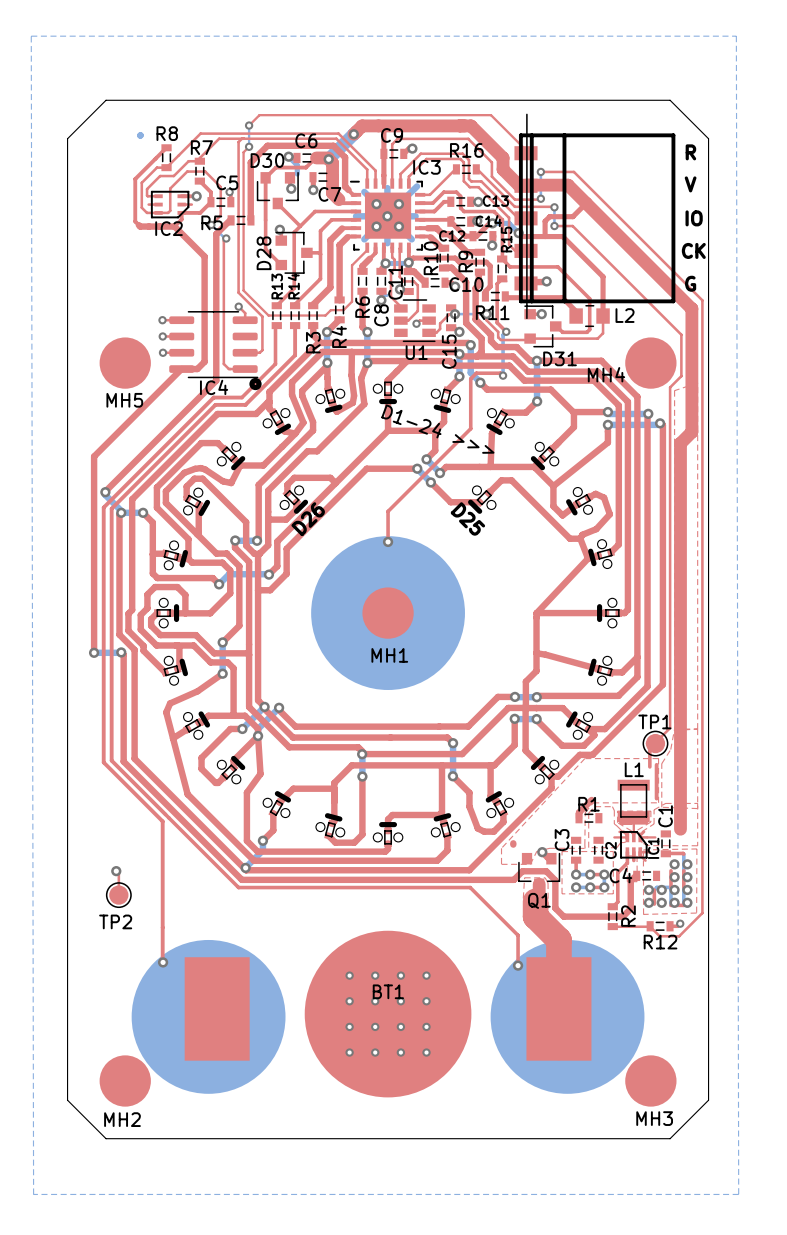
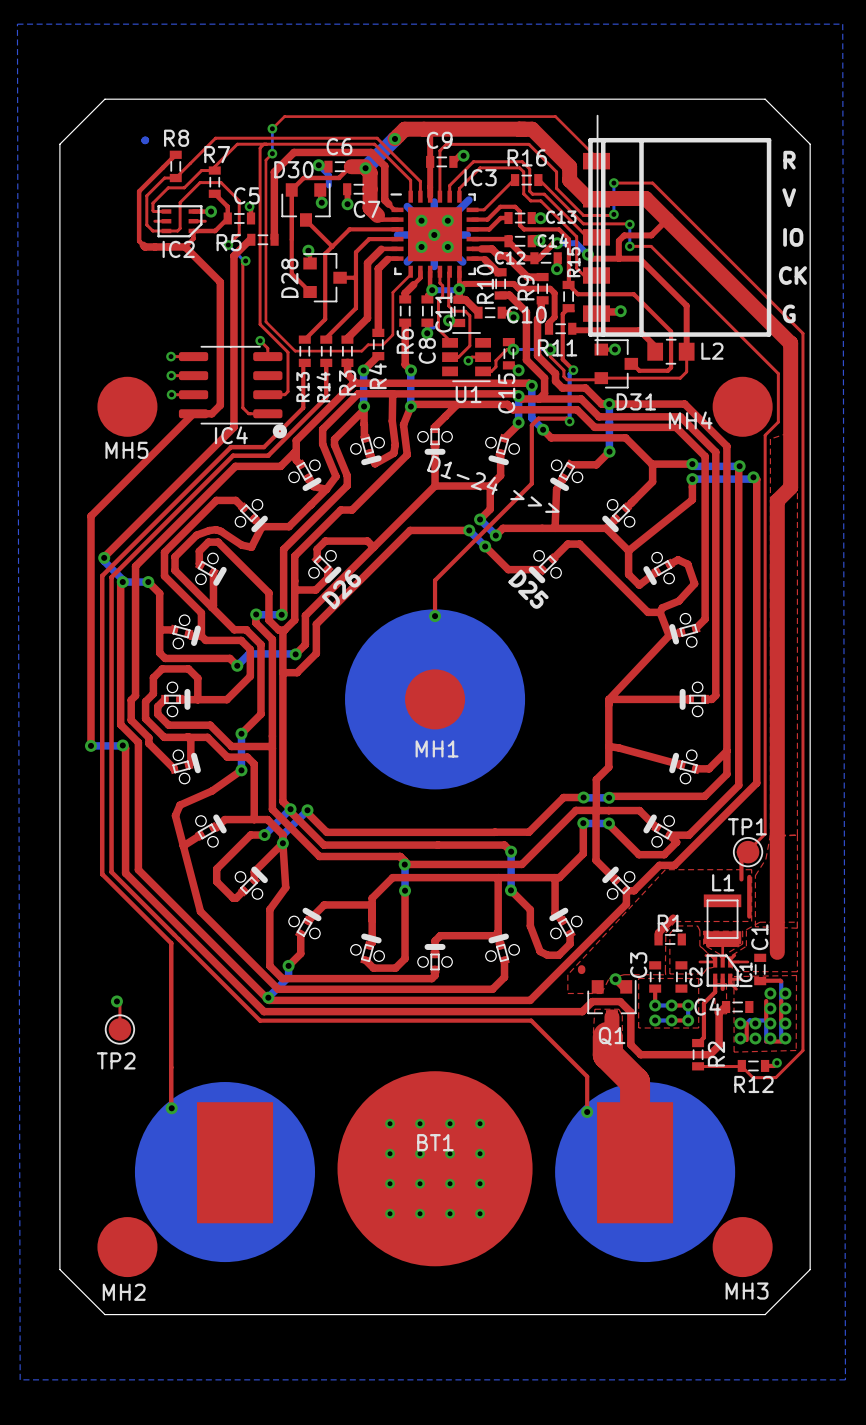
R13 name position: R13 (277, 286) -> R13 (303, 387)
R14 name position: R14 (293, 286) -> R14 (323, 387)

